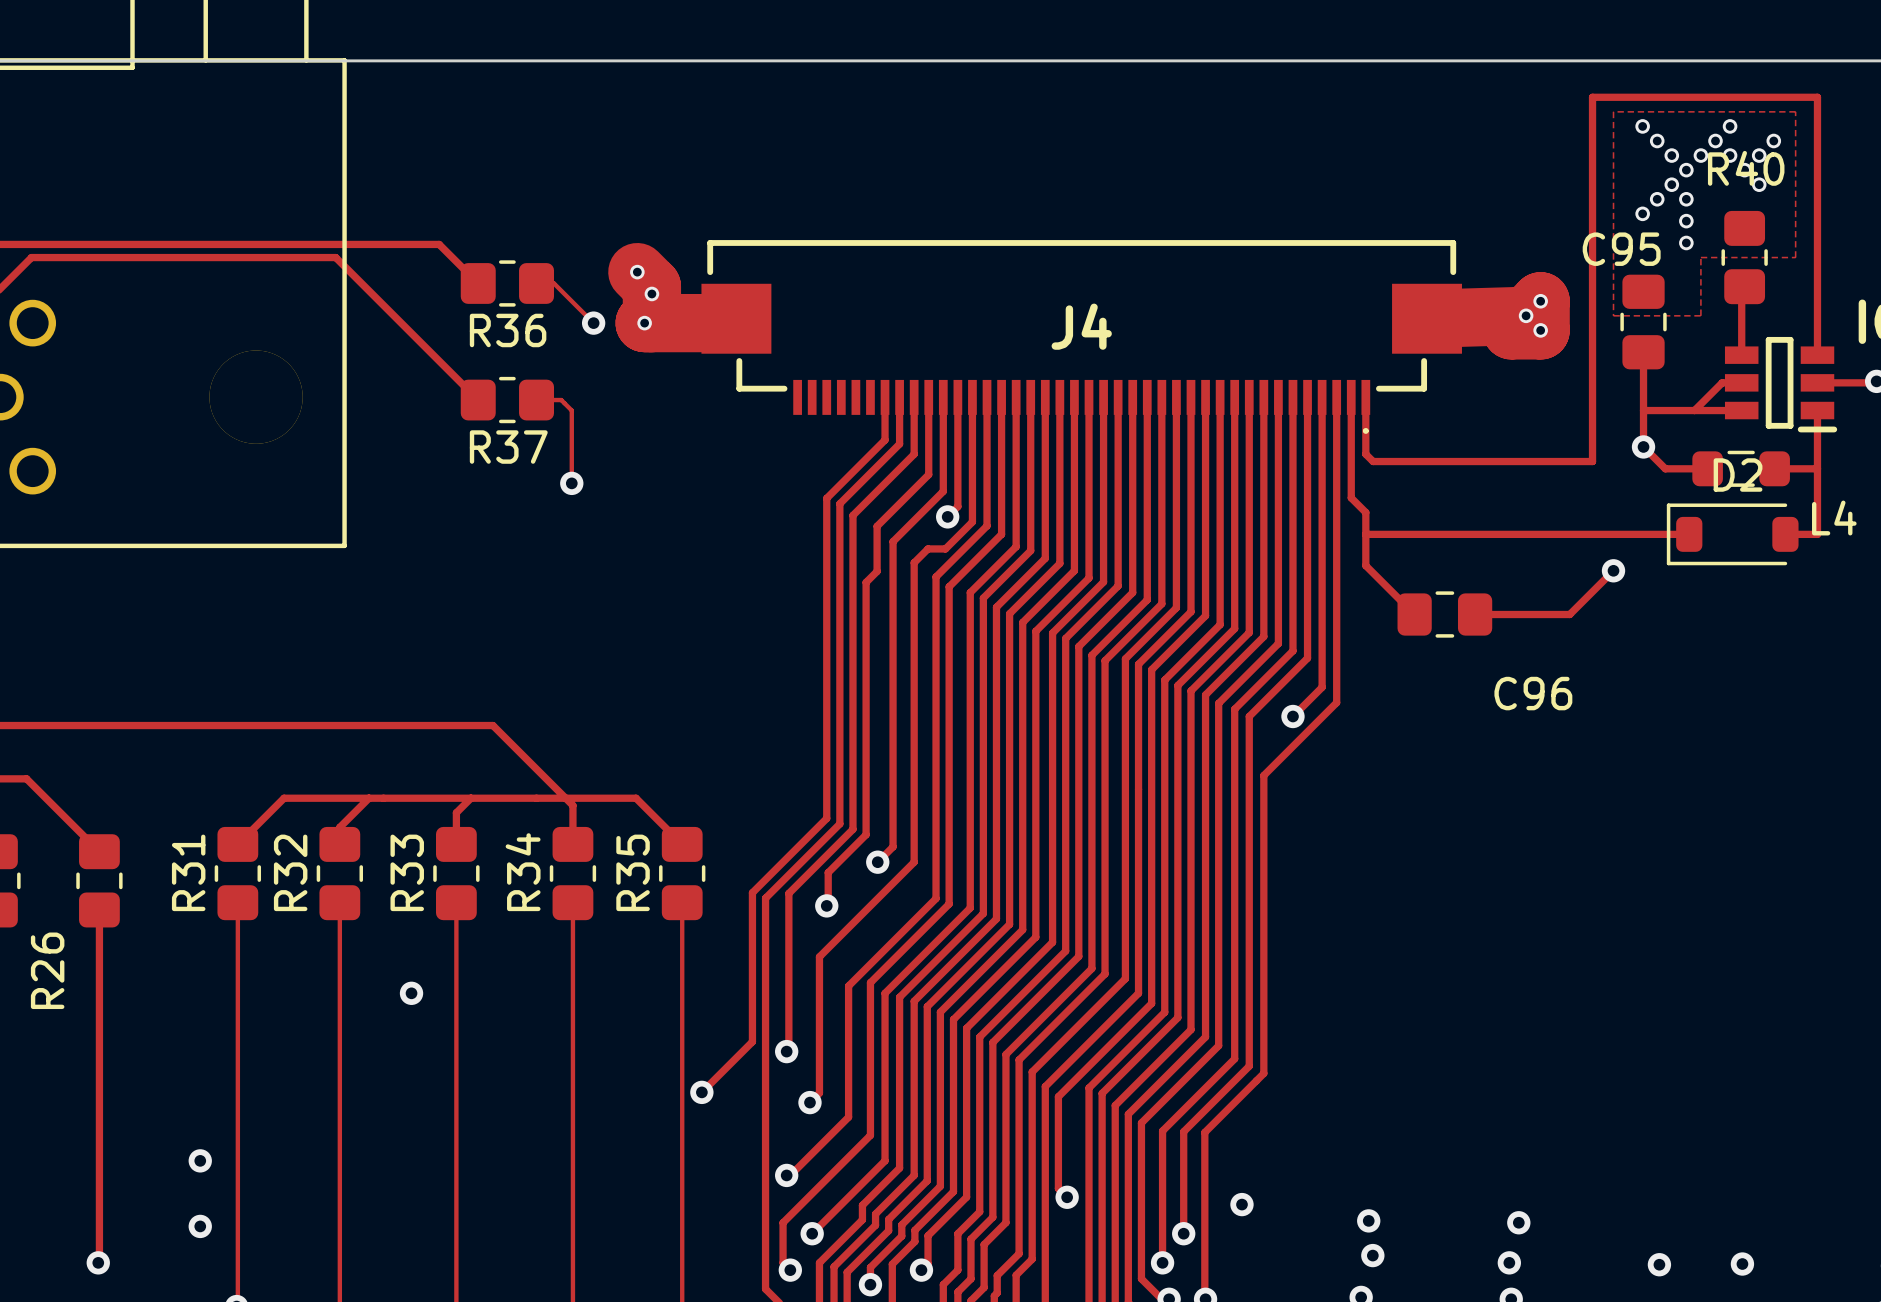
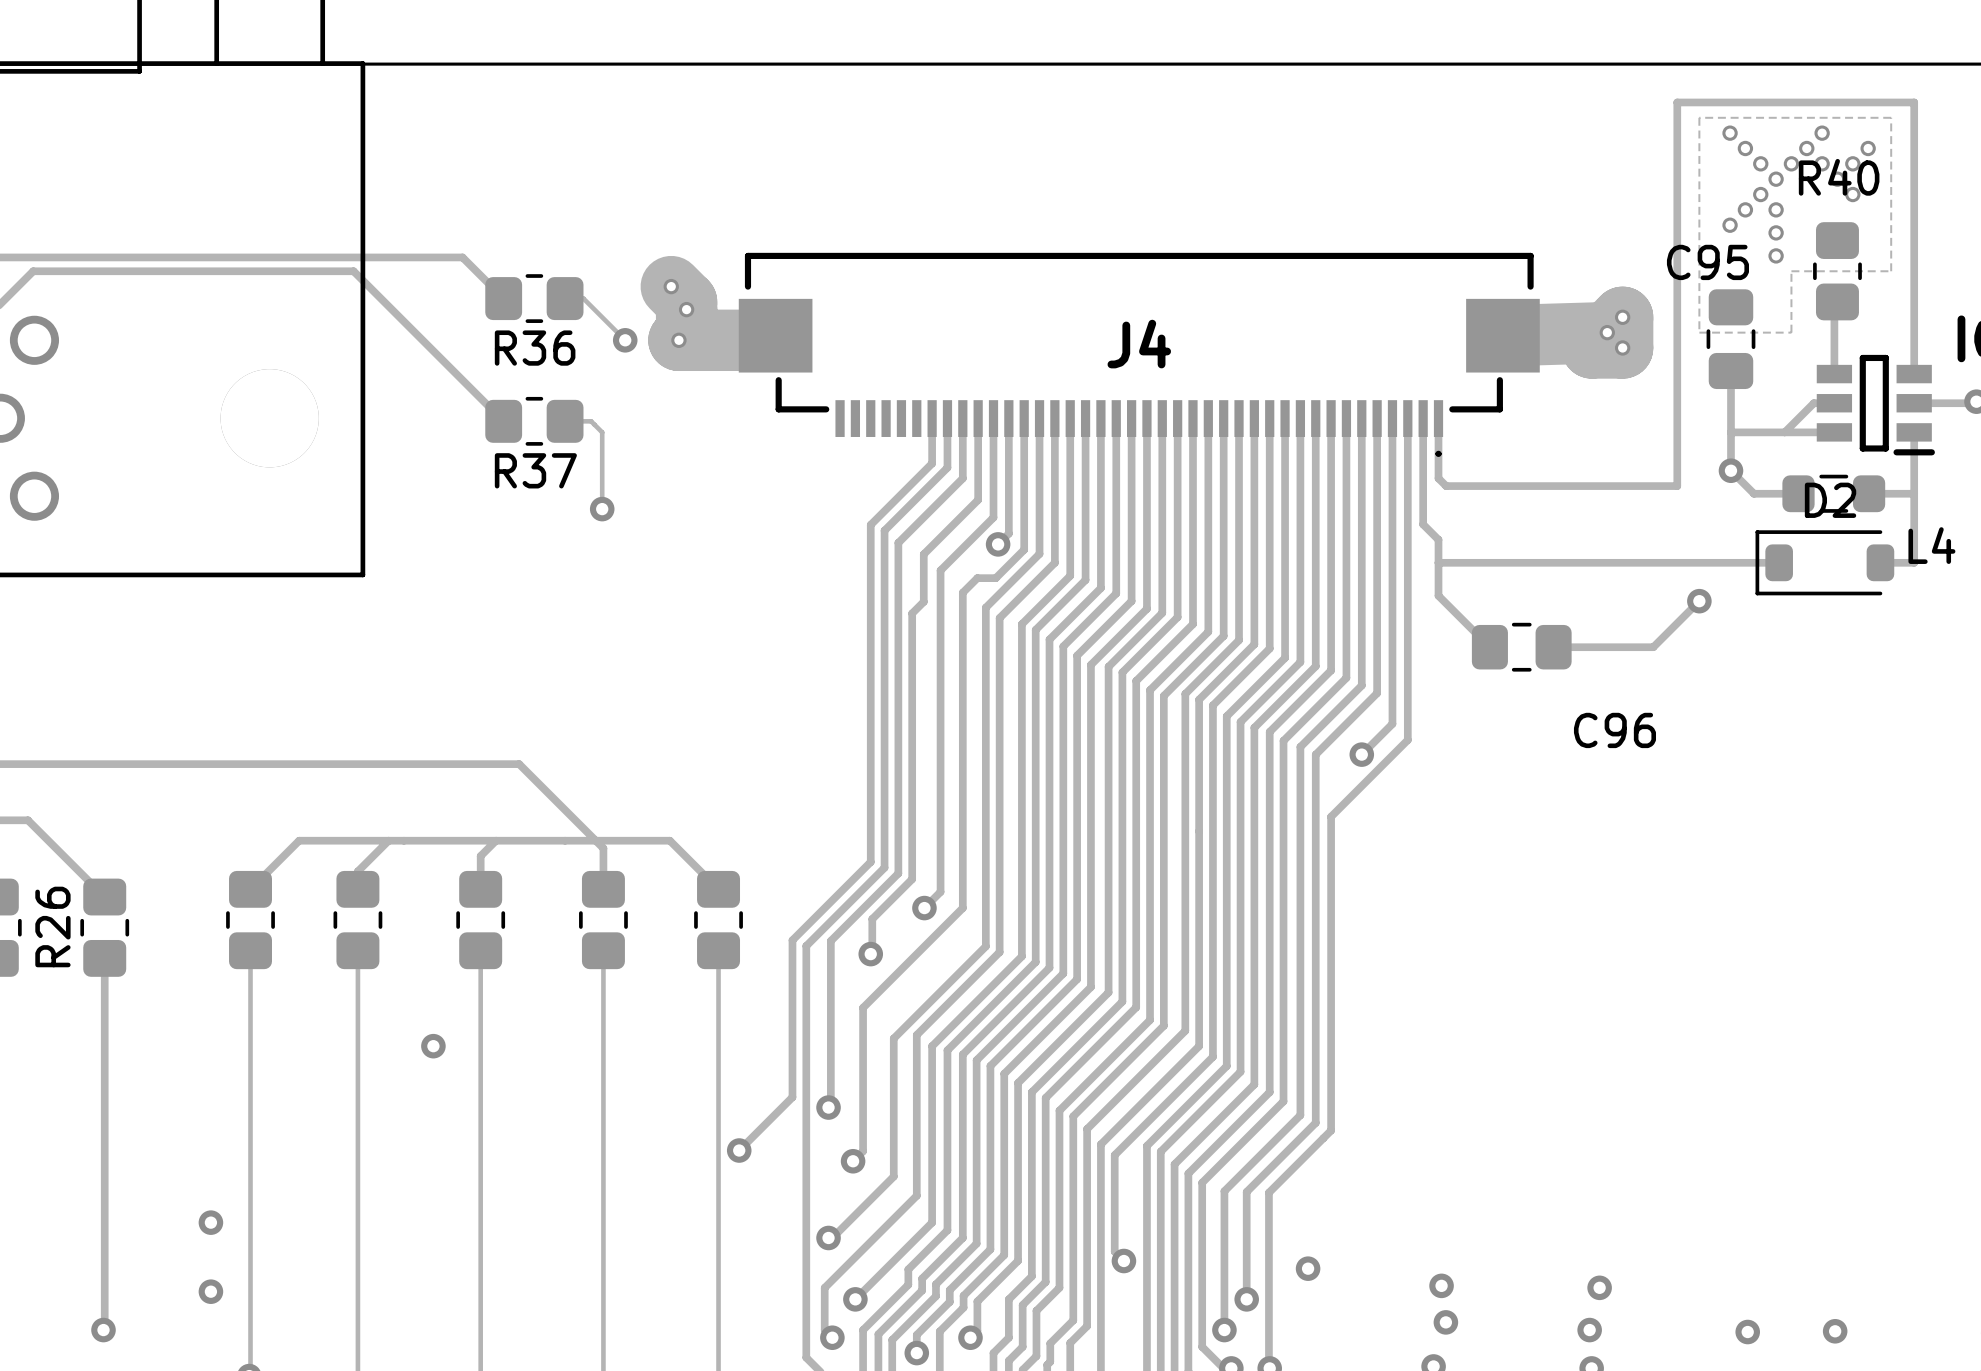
R31 name: R31 (188, 872) -> none
R32 name: R32 (290, 872) -> none
R33 name: R33 (407, 872) -> none
R34 name: R34 (523, 872) -> none
R35 name: R35 (633, 872) -> none
R26 name position: R26 (47, 970) -> R26 (52, 926)

